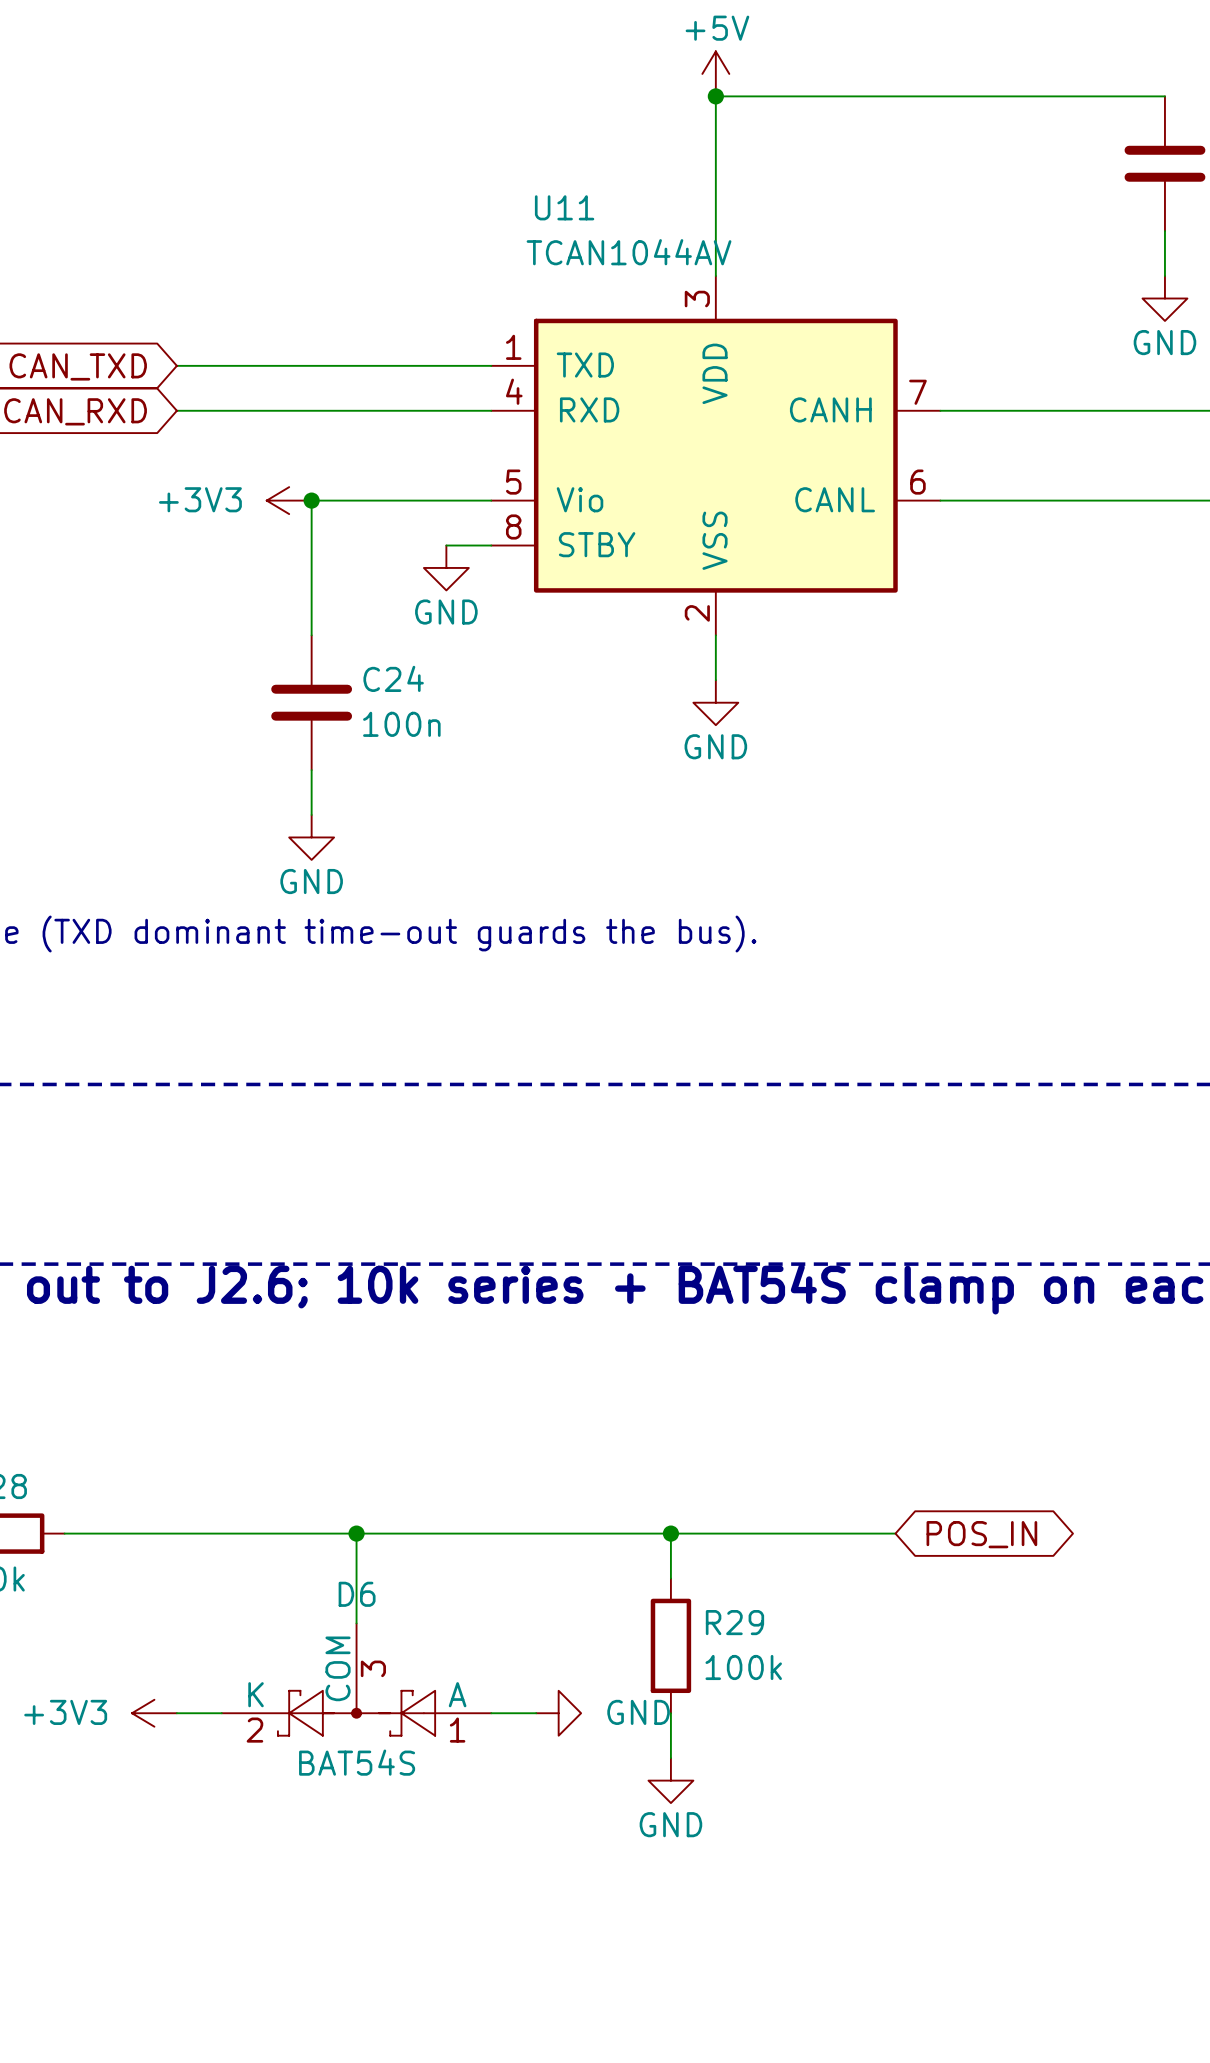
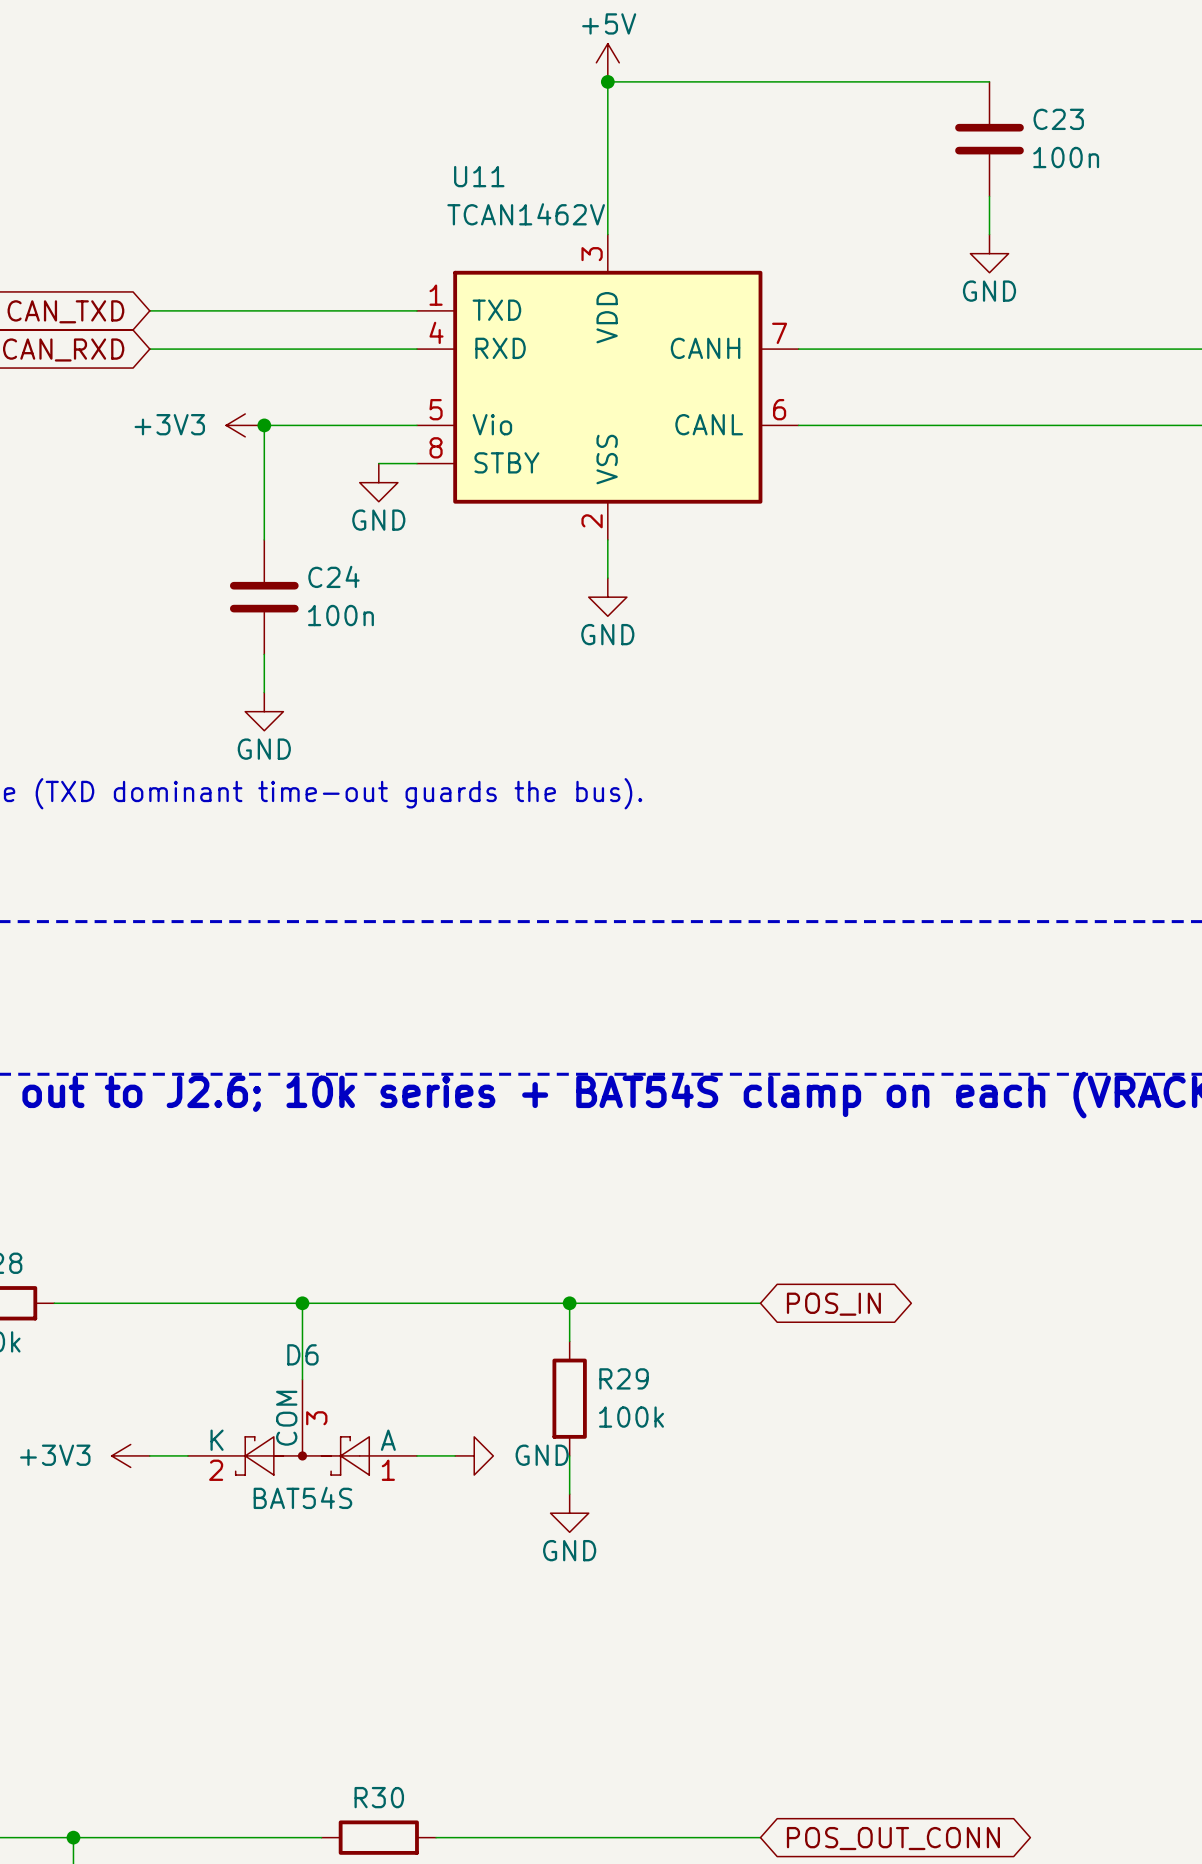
U11 value: TCAN1044AV (629, 252) -> TCAN1462V (526, 214)

